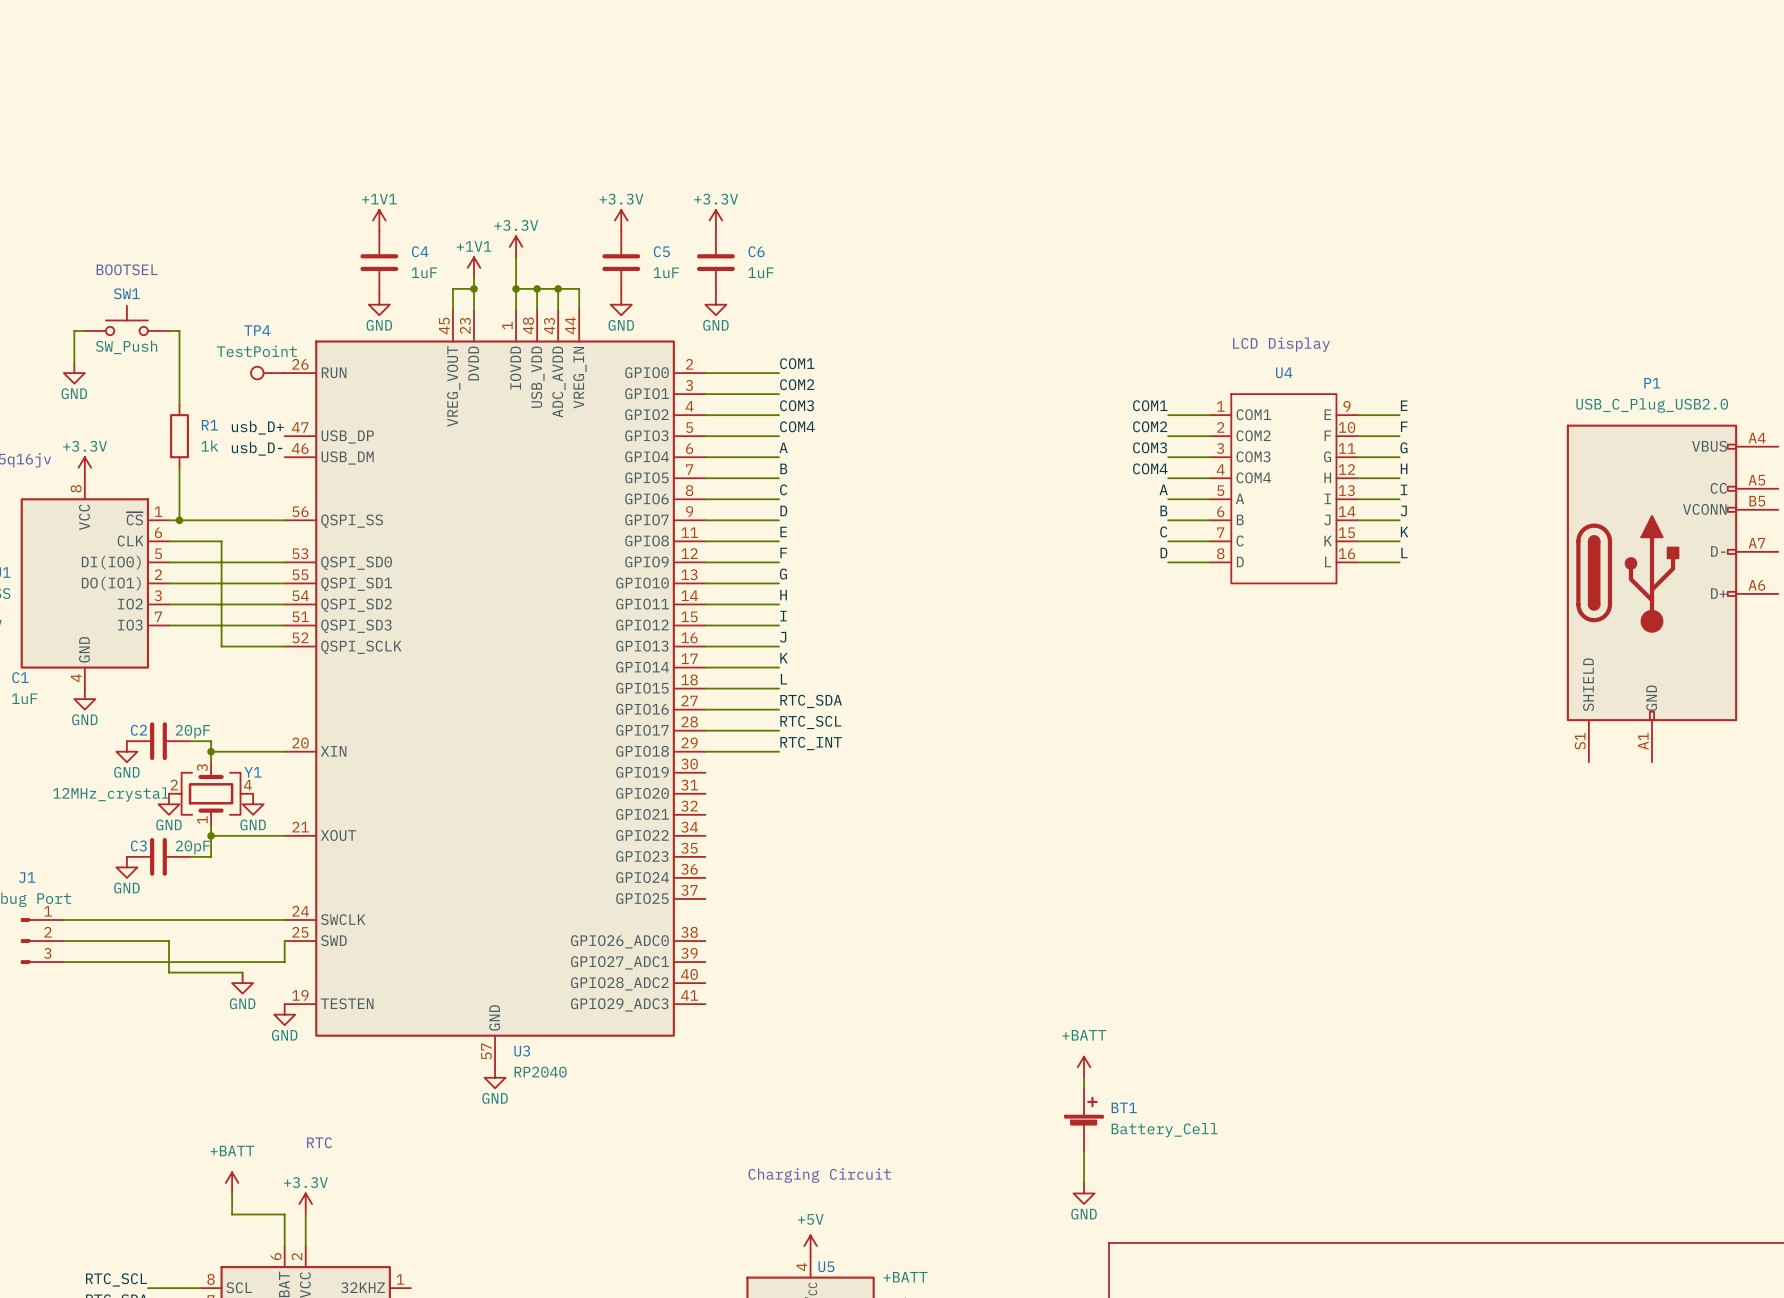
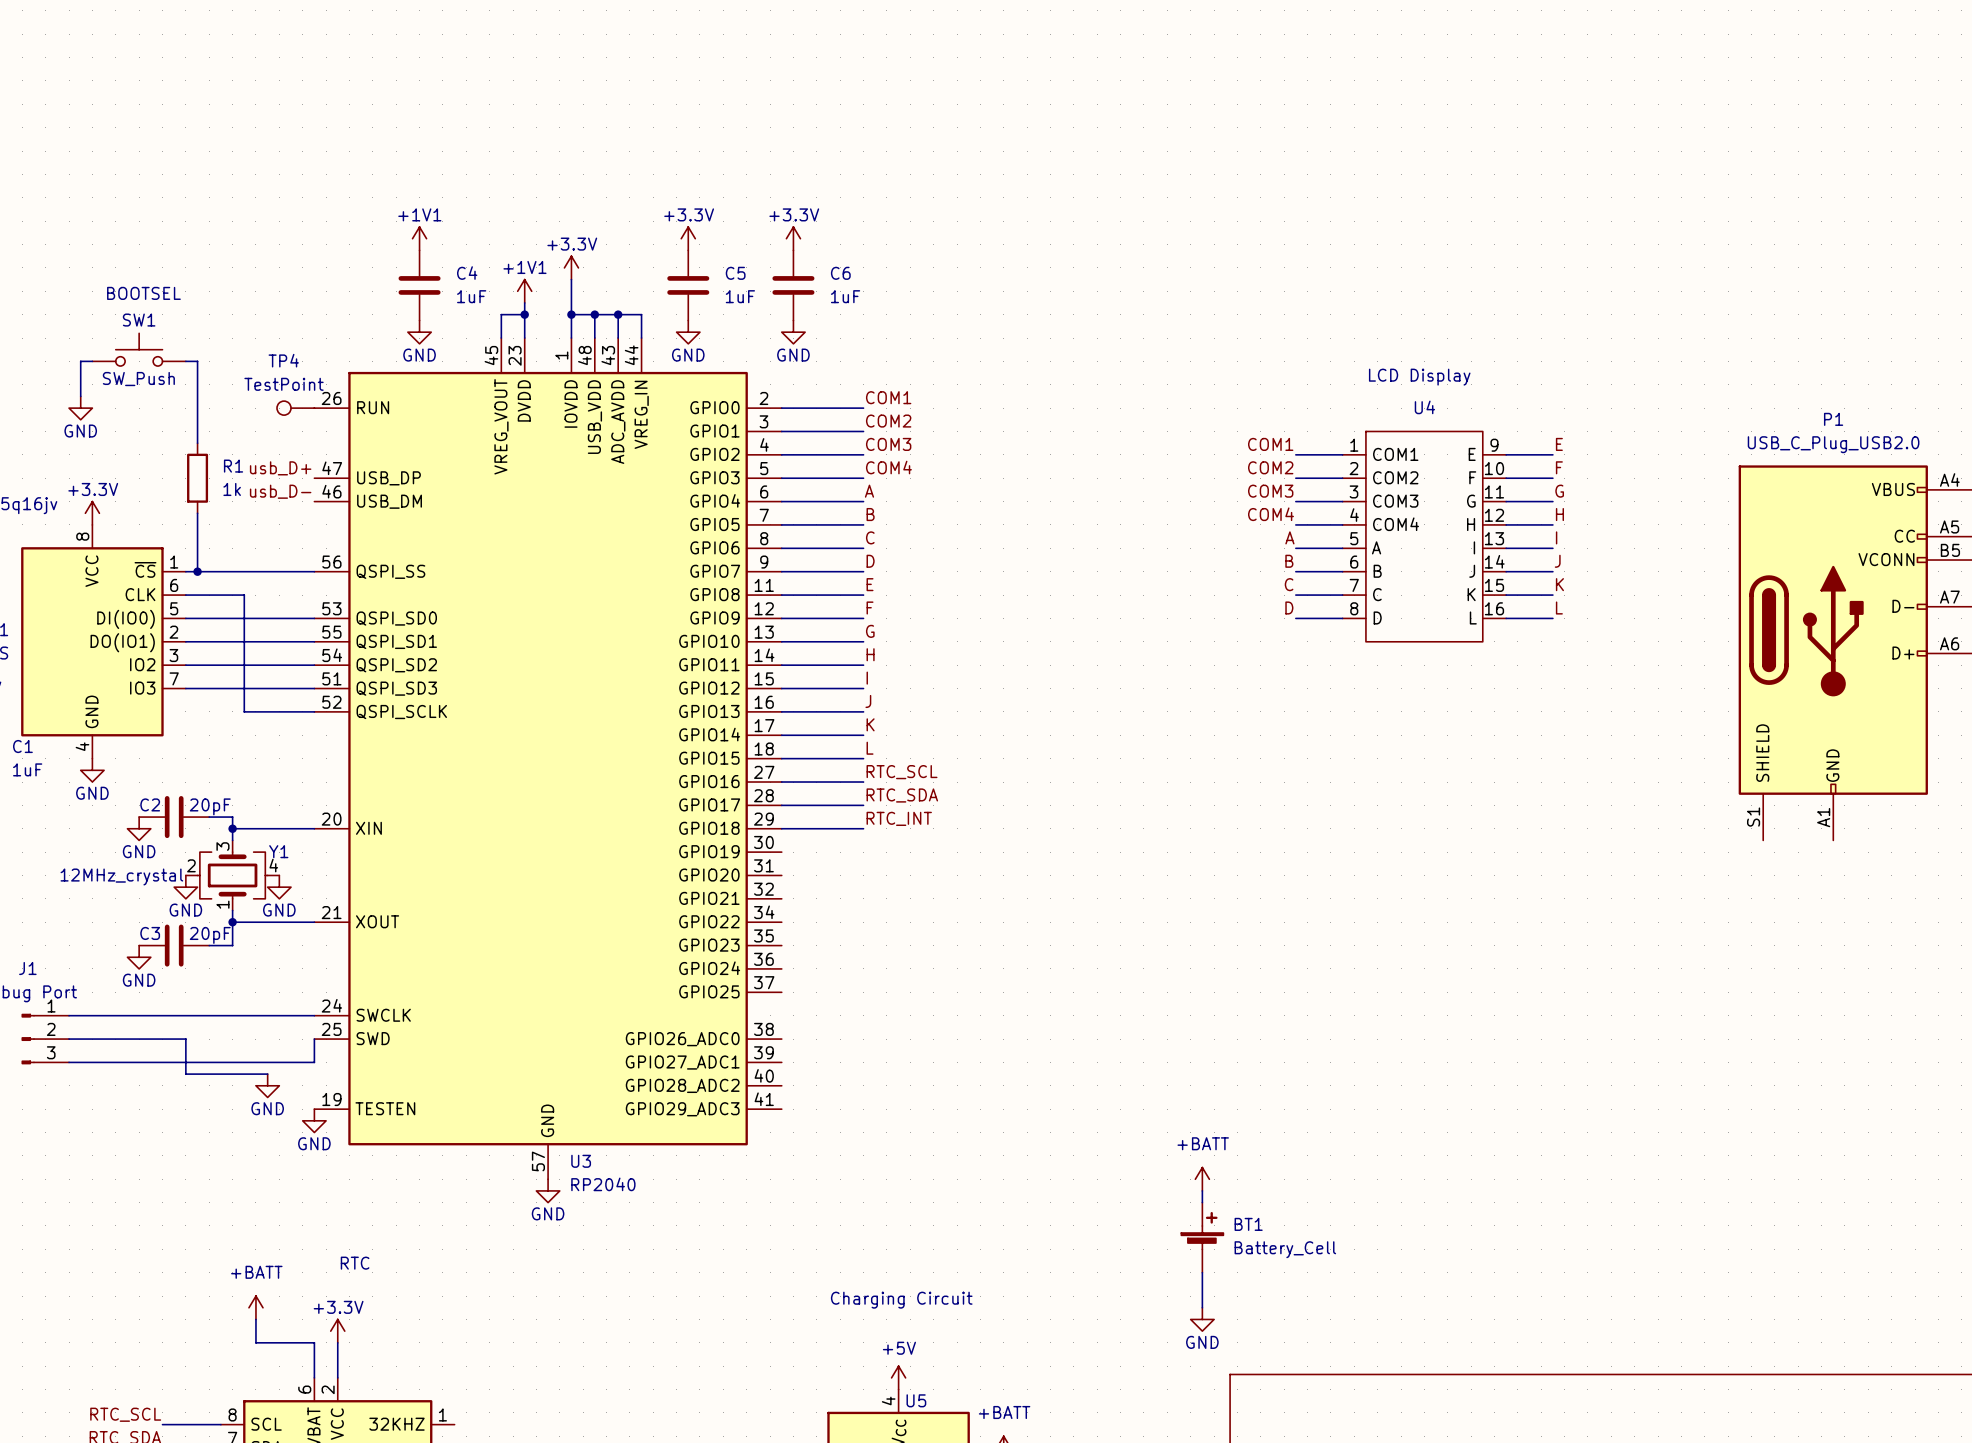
label: RTC_SDA (811, 701) -> RTC_SCL (902, 772)
label: RTC_SCL (810, 722) -> RTC_SDA (902, 795)

